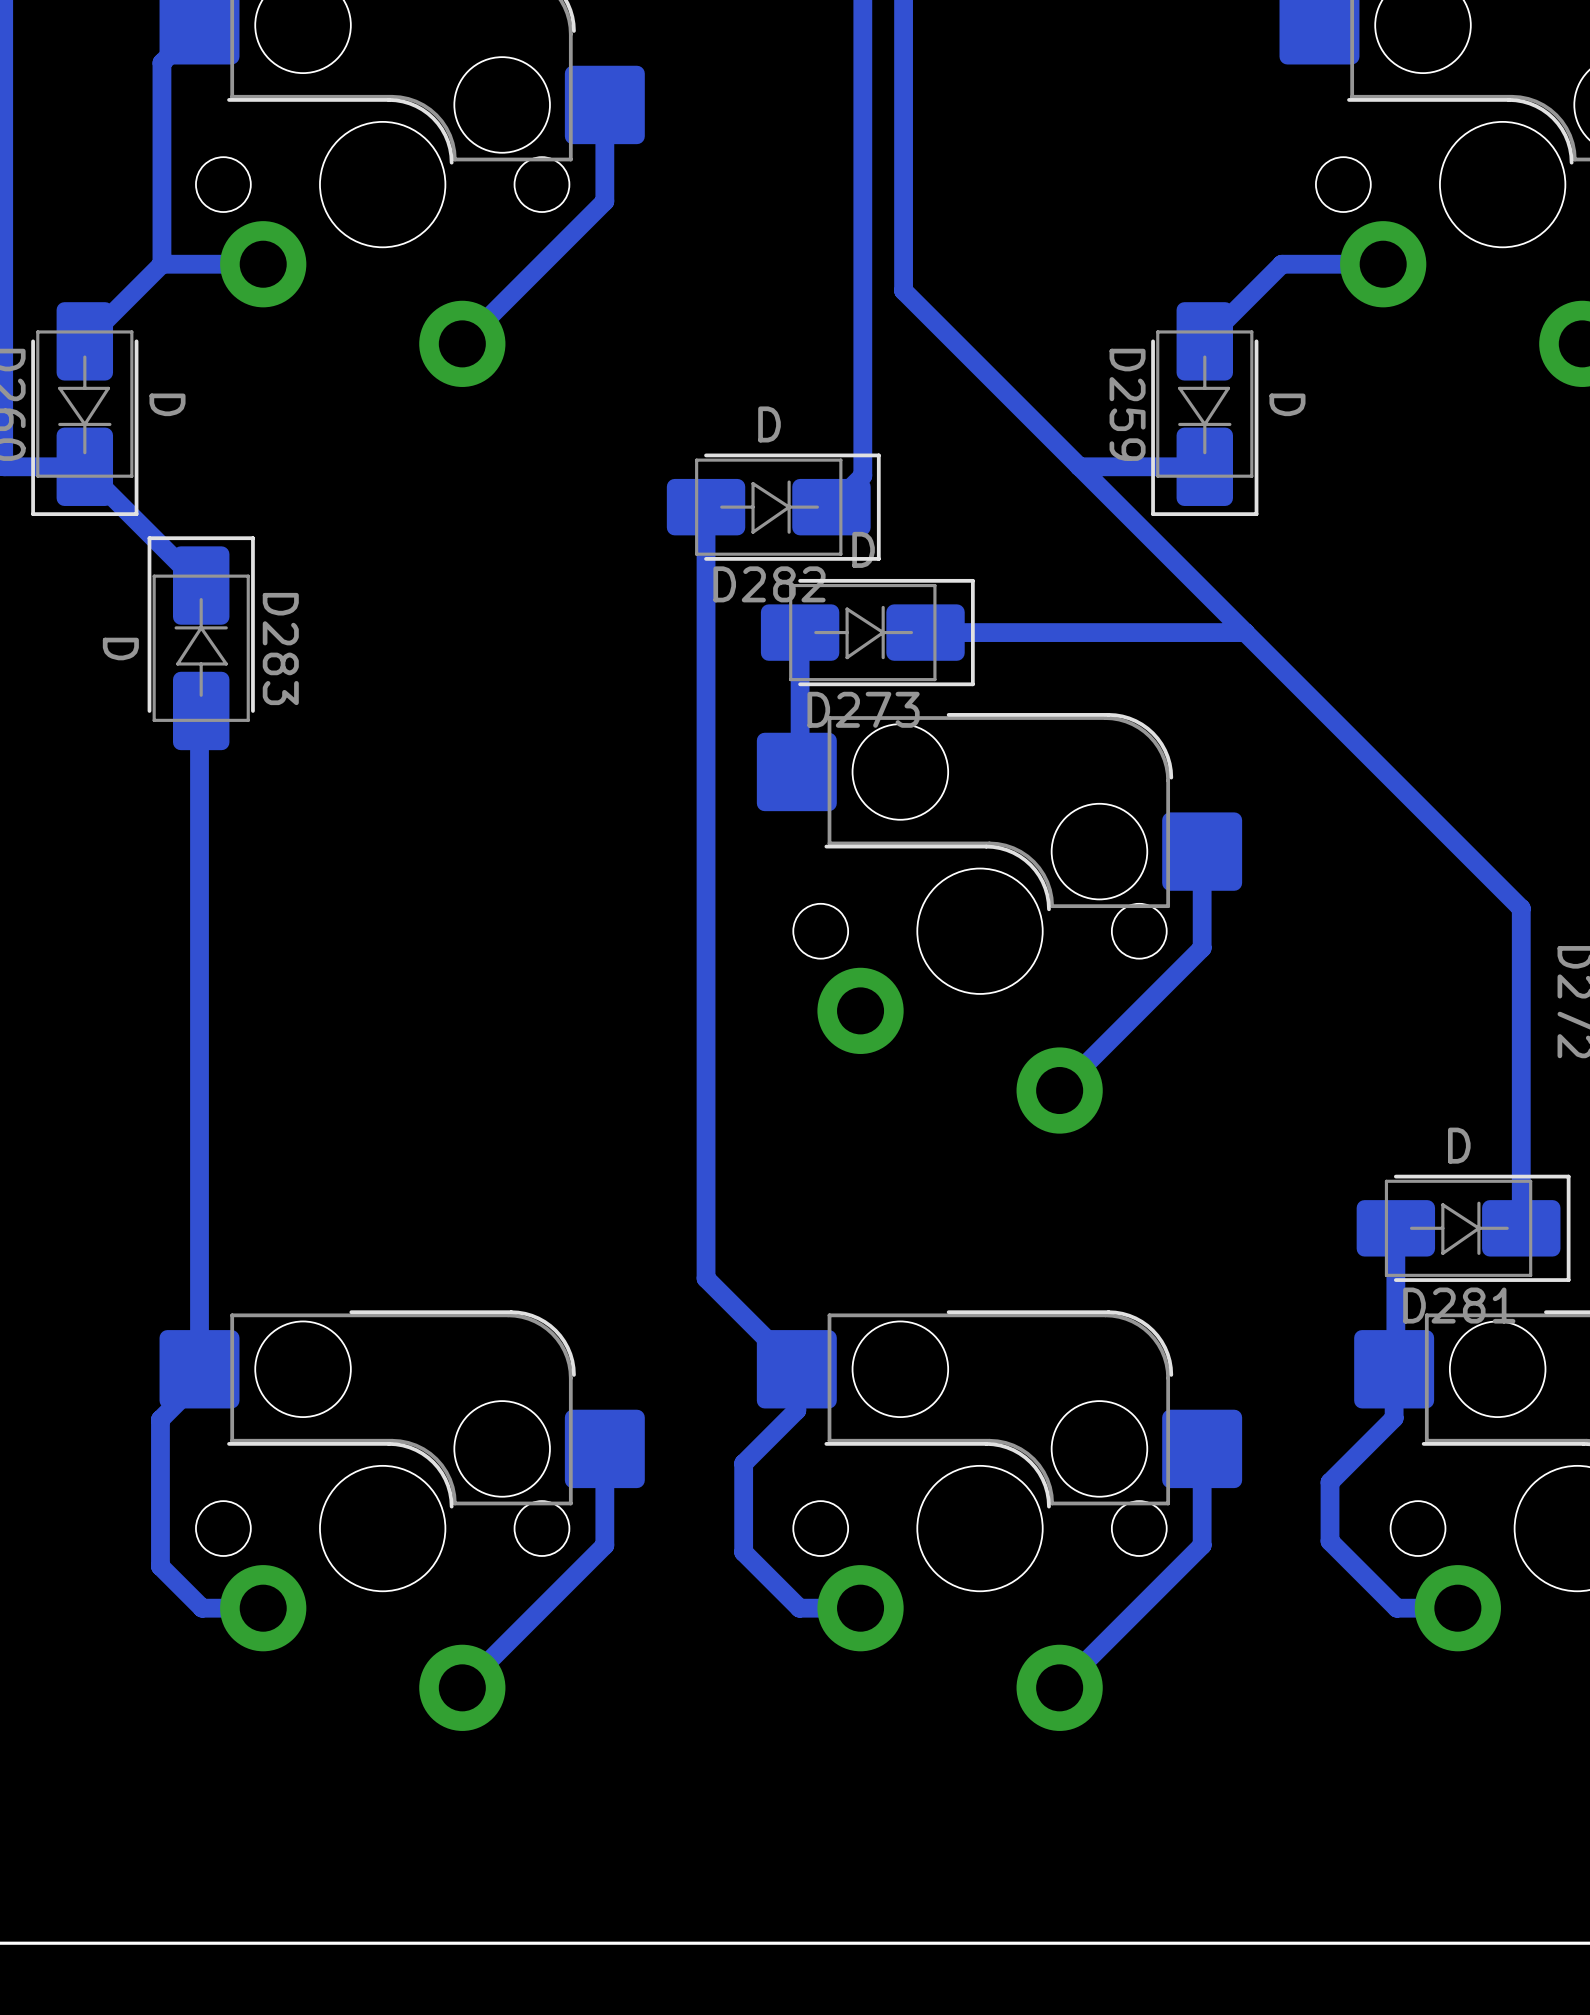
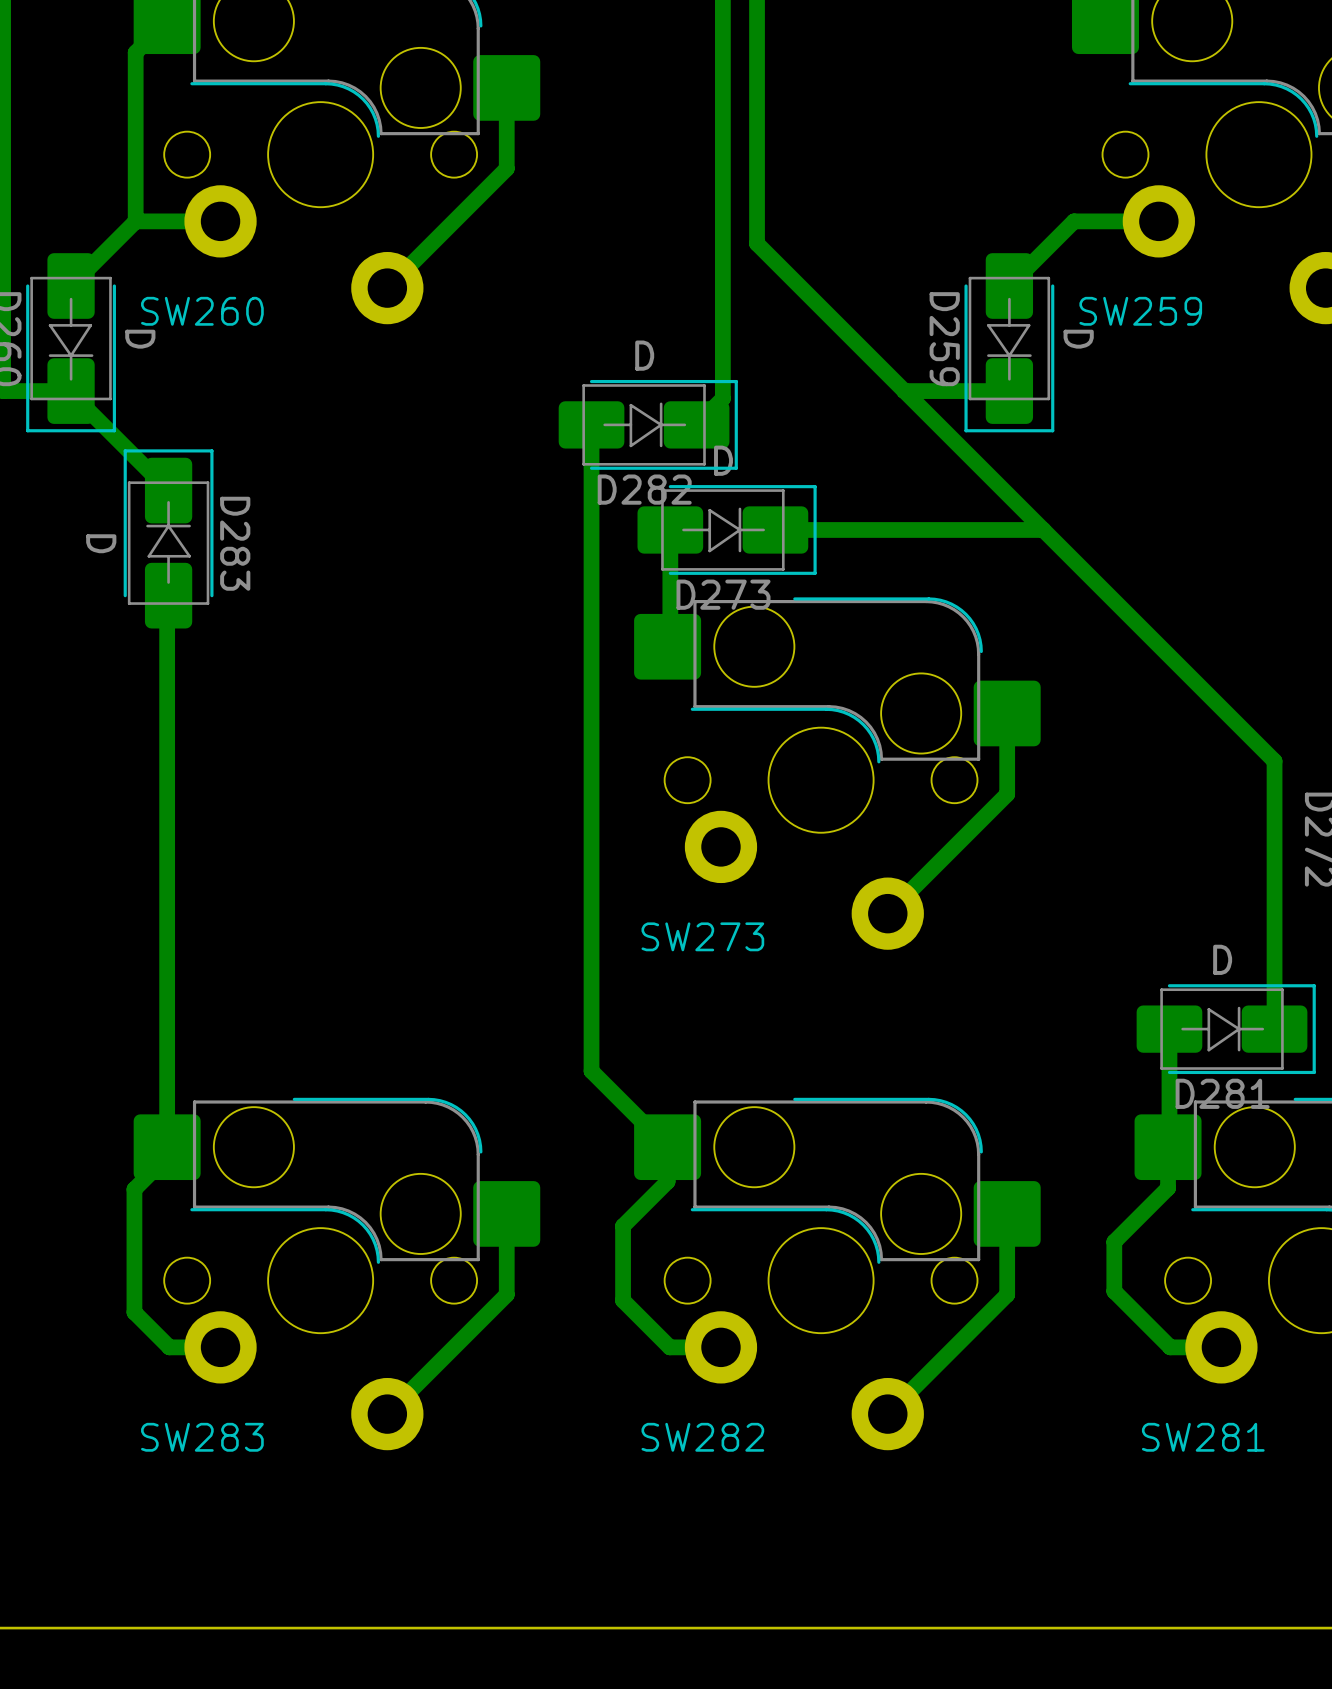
SW260 name: none -> SW260 (202, 311)
SW259 name: none -> SW259 (1140, 311)
SW273 name: none -> SW273 (702, 936)
SW283 name: none -> SW283 (202, 1437)
SW282 name: none -> SW282 (702, 1437)
SW281 name: none -> SW281 (1203, 1437)

